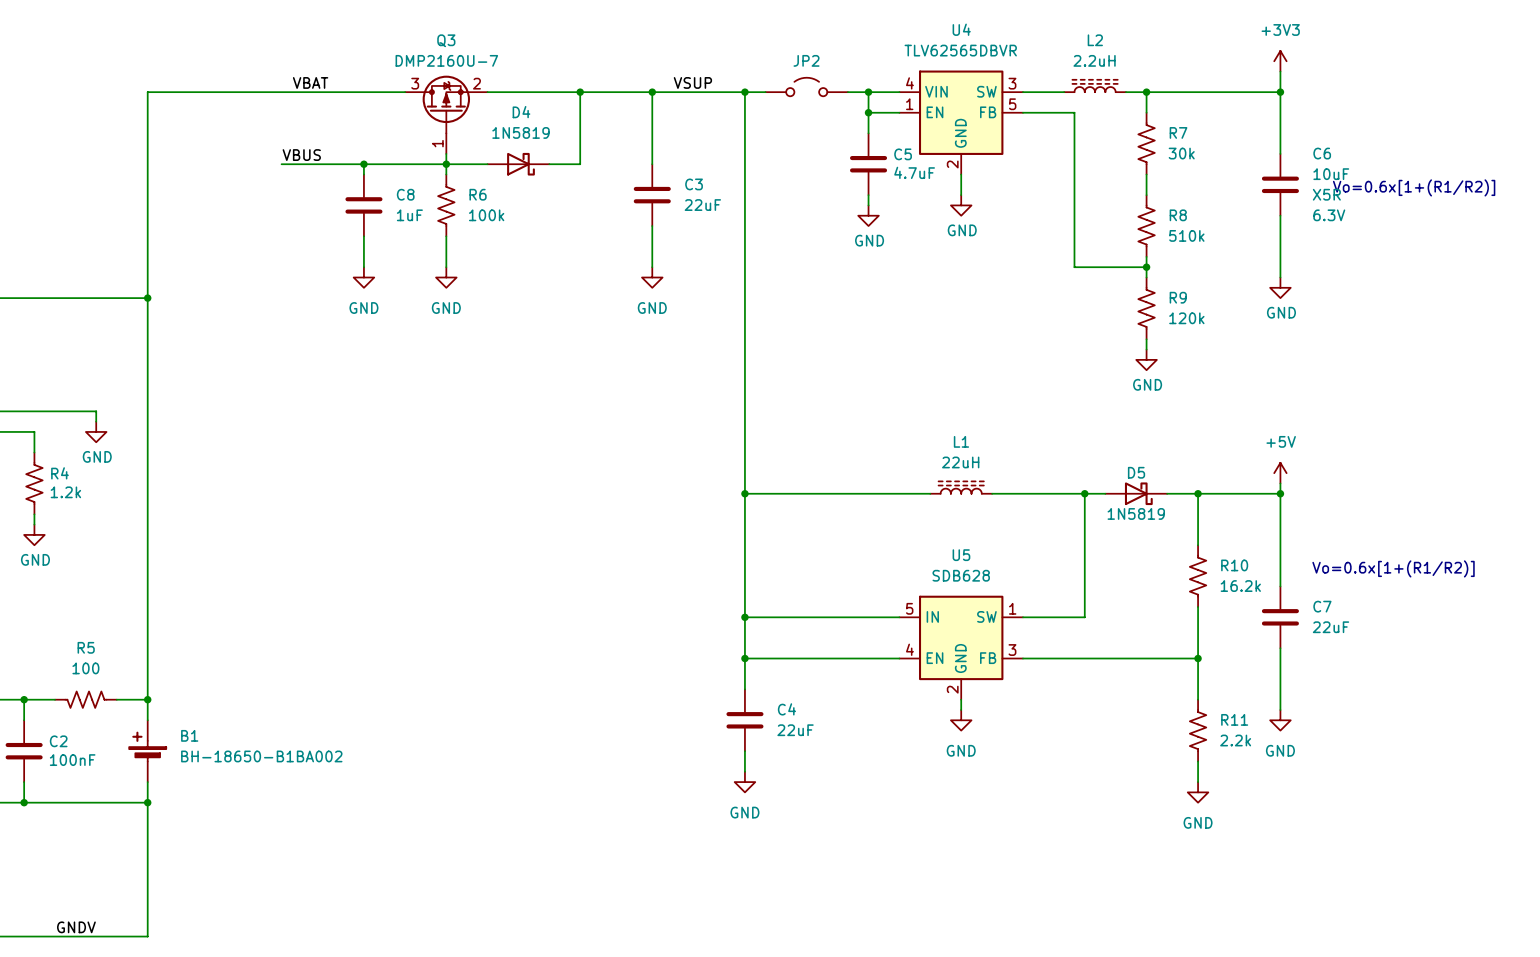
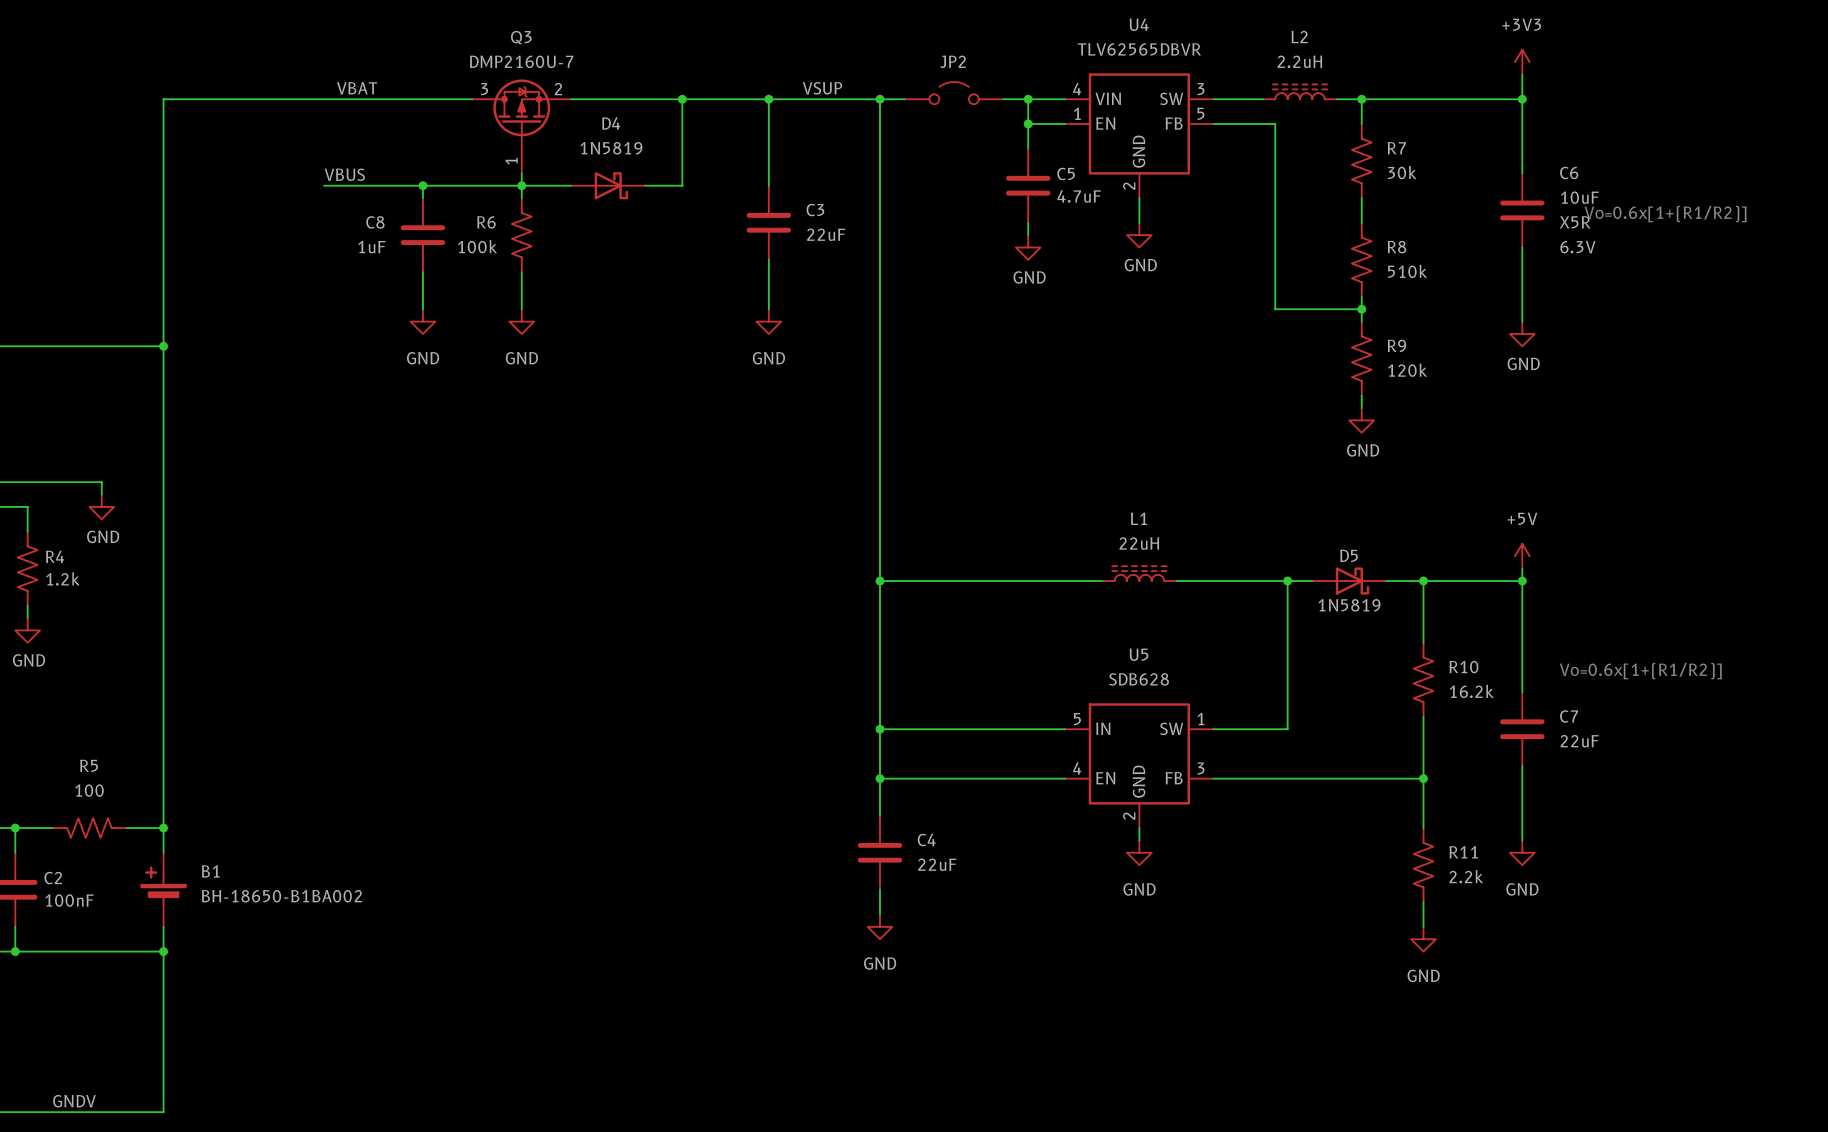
C8 name position: C8 (405, 194) -> C8 (375, 222)
R6 name position: R6 (478, 194) -> R6 (486, 222)
C8 value position: 1uF (409, 215) -> 1uF (371, 247)
R6 value position: 100k (486, 215) -> 100k (477, 246)

